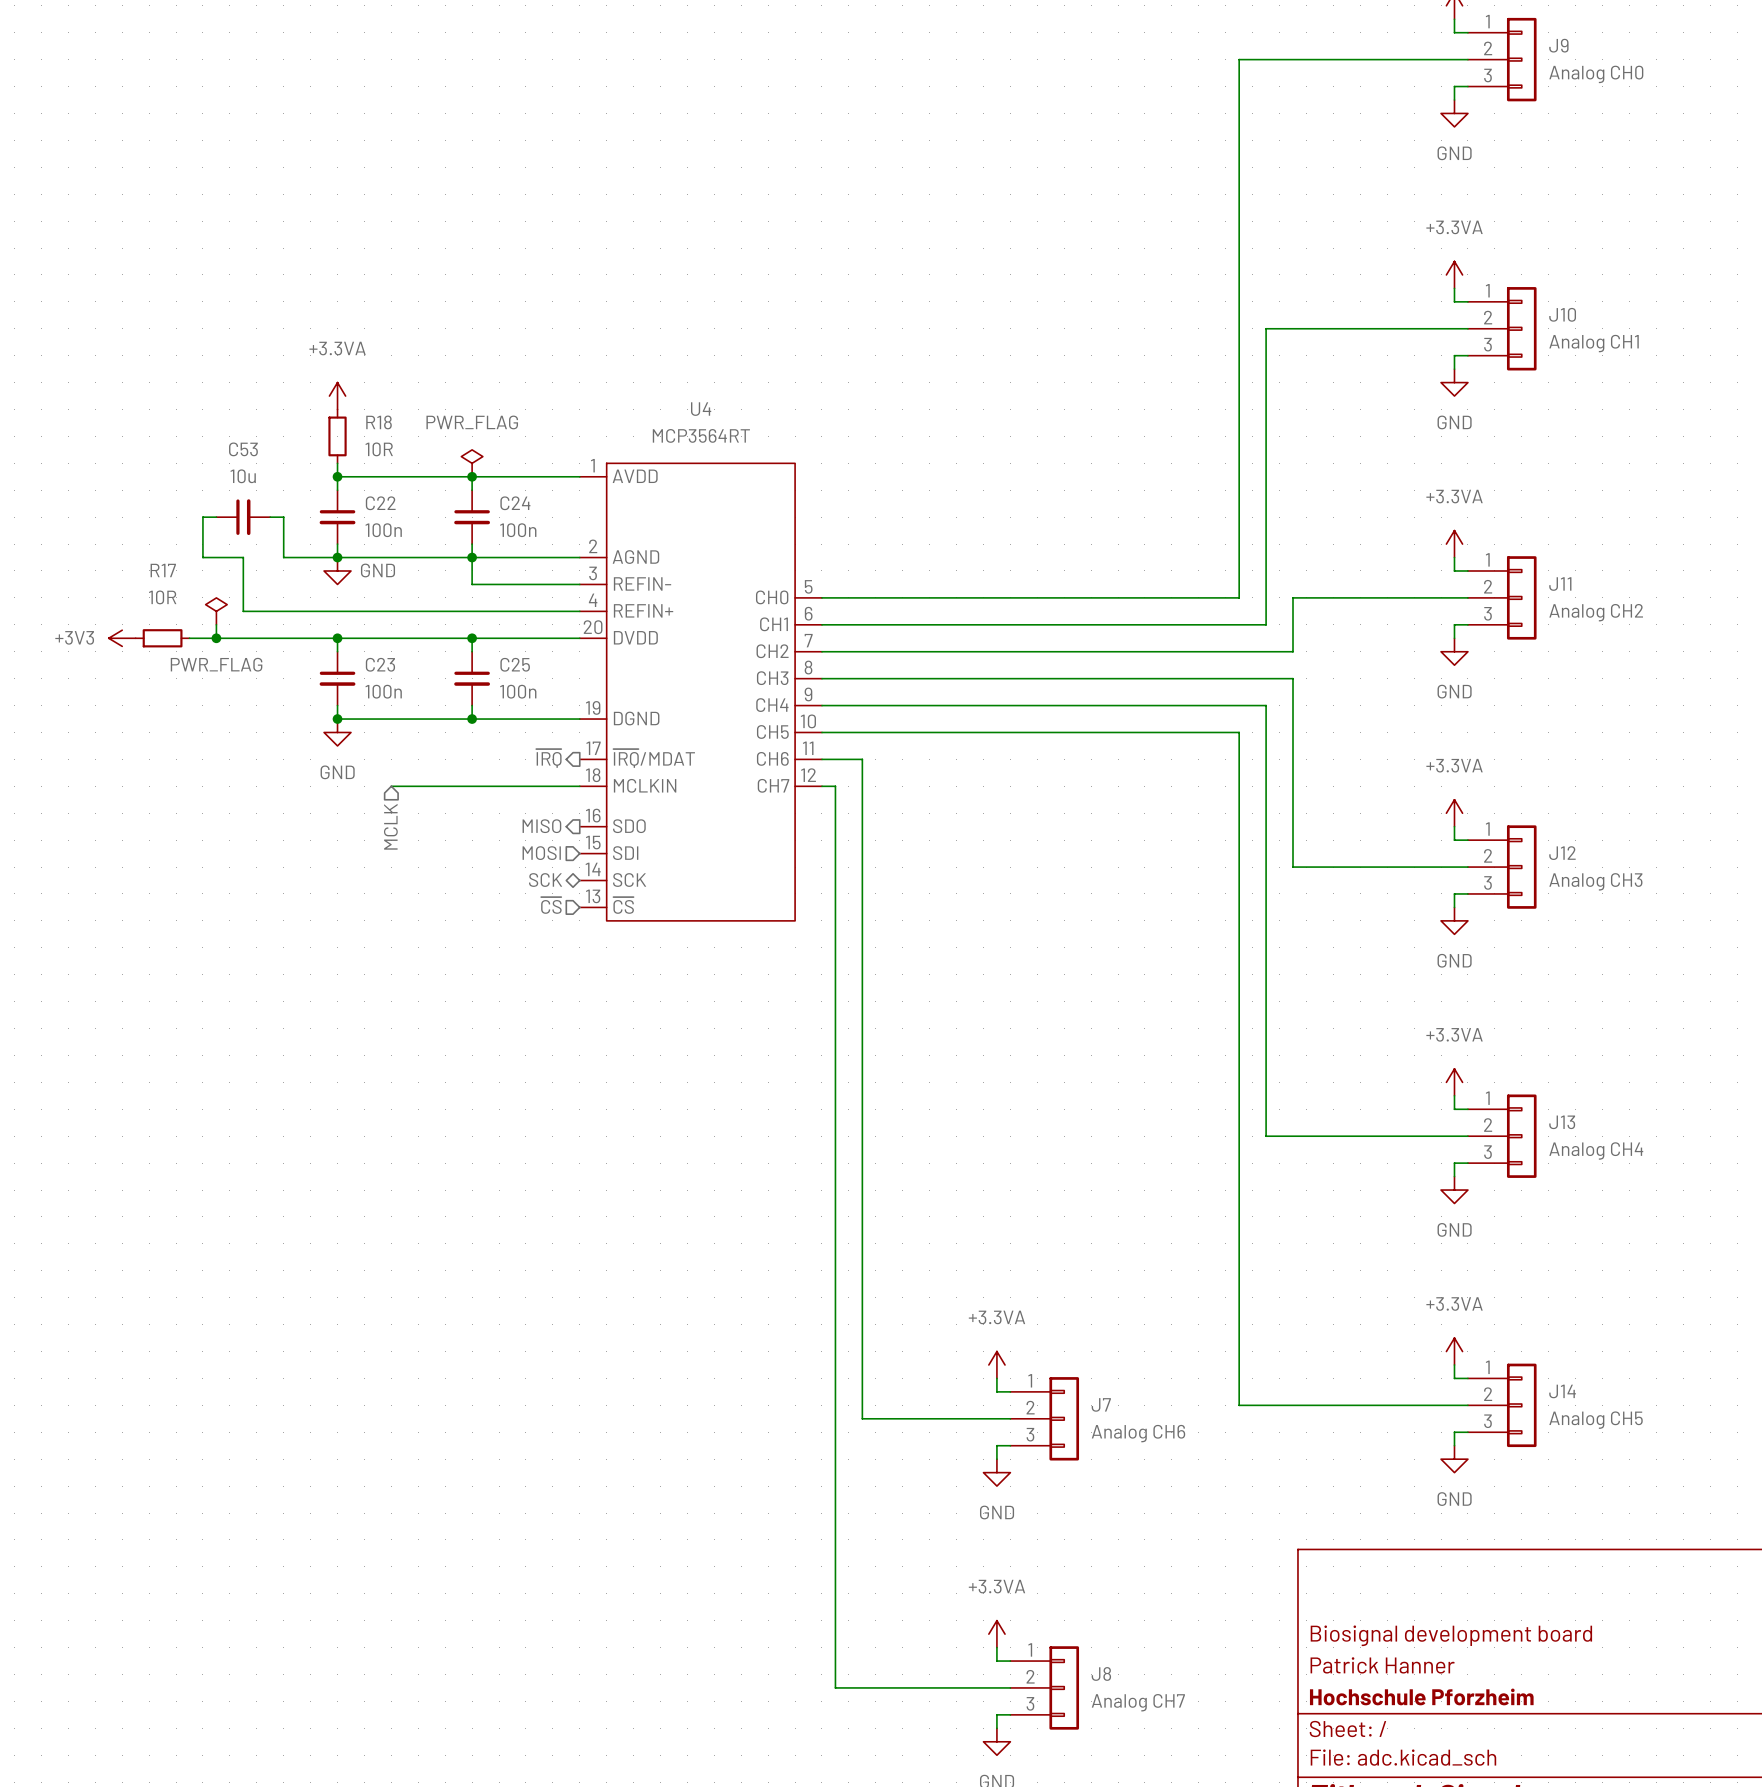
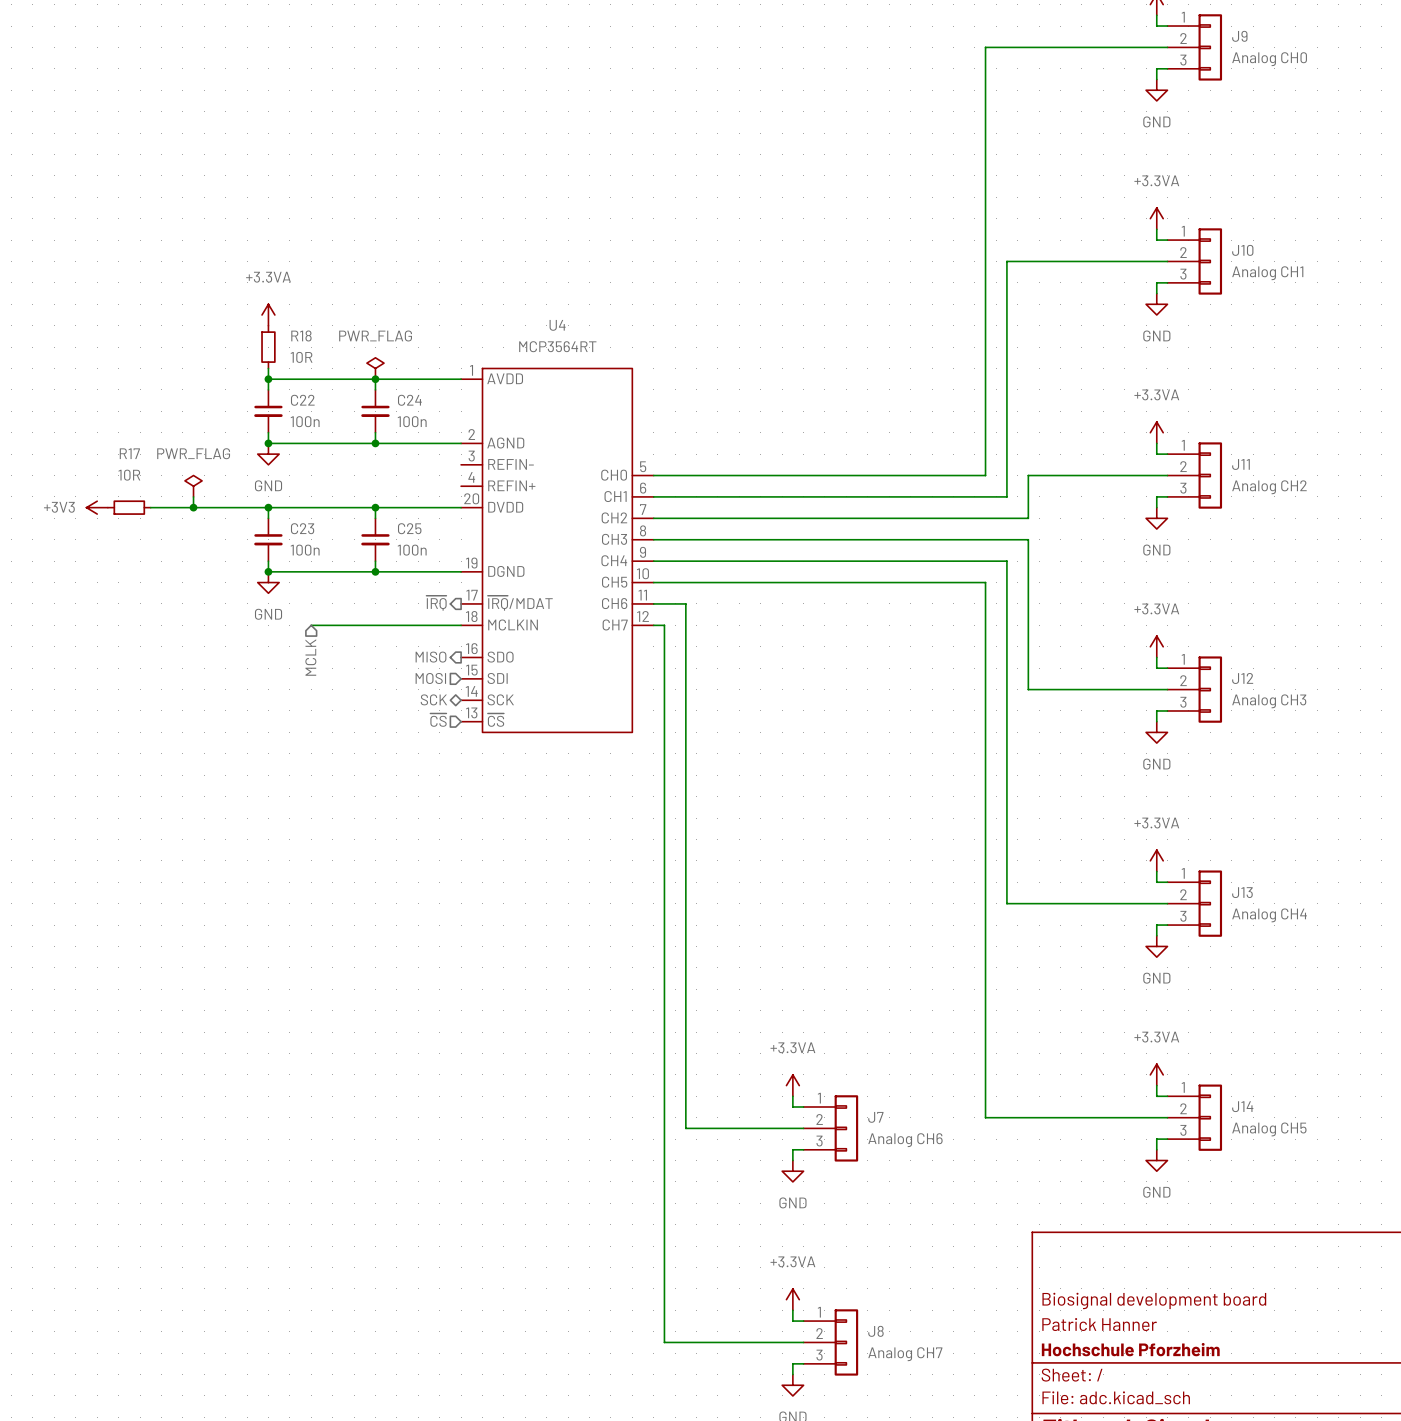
wire: (216, 517) (202, 517) (202, 557) (243, 557) (243, 611) (579, 611) -> none
C53: 10u (243, 517) -> none
wire: (270, 517) (283, 517) (283, 557) (337, 557) -> none
wire: (472, 557) (472, 584) (579, 584) -> none
power symbol text position: GND (377, 570) -> GND (268, 485)
power symbol position: PWR_FLAG (216, 611) -> PWR_FLAG (193, 486)
wire: (216, 624) (216, 638) -> (193, 496) (193, 507)
junction position: (216, 638) -> (193, 507)
power symbol text position: PWR_FLAG (216, 664) -> PWR_FLAG (193, 453)

